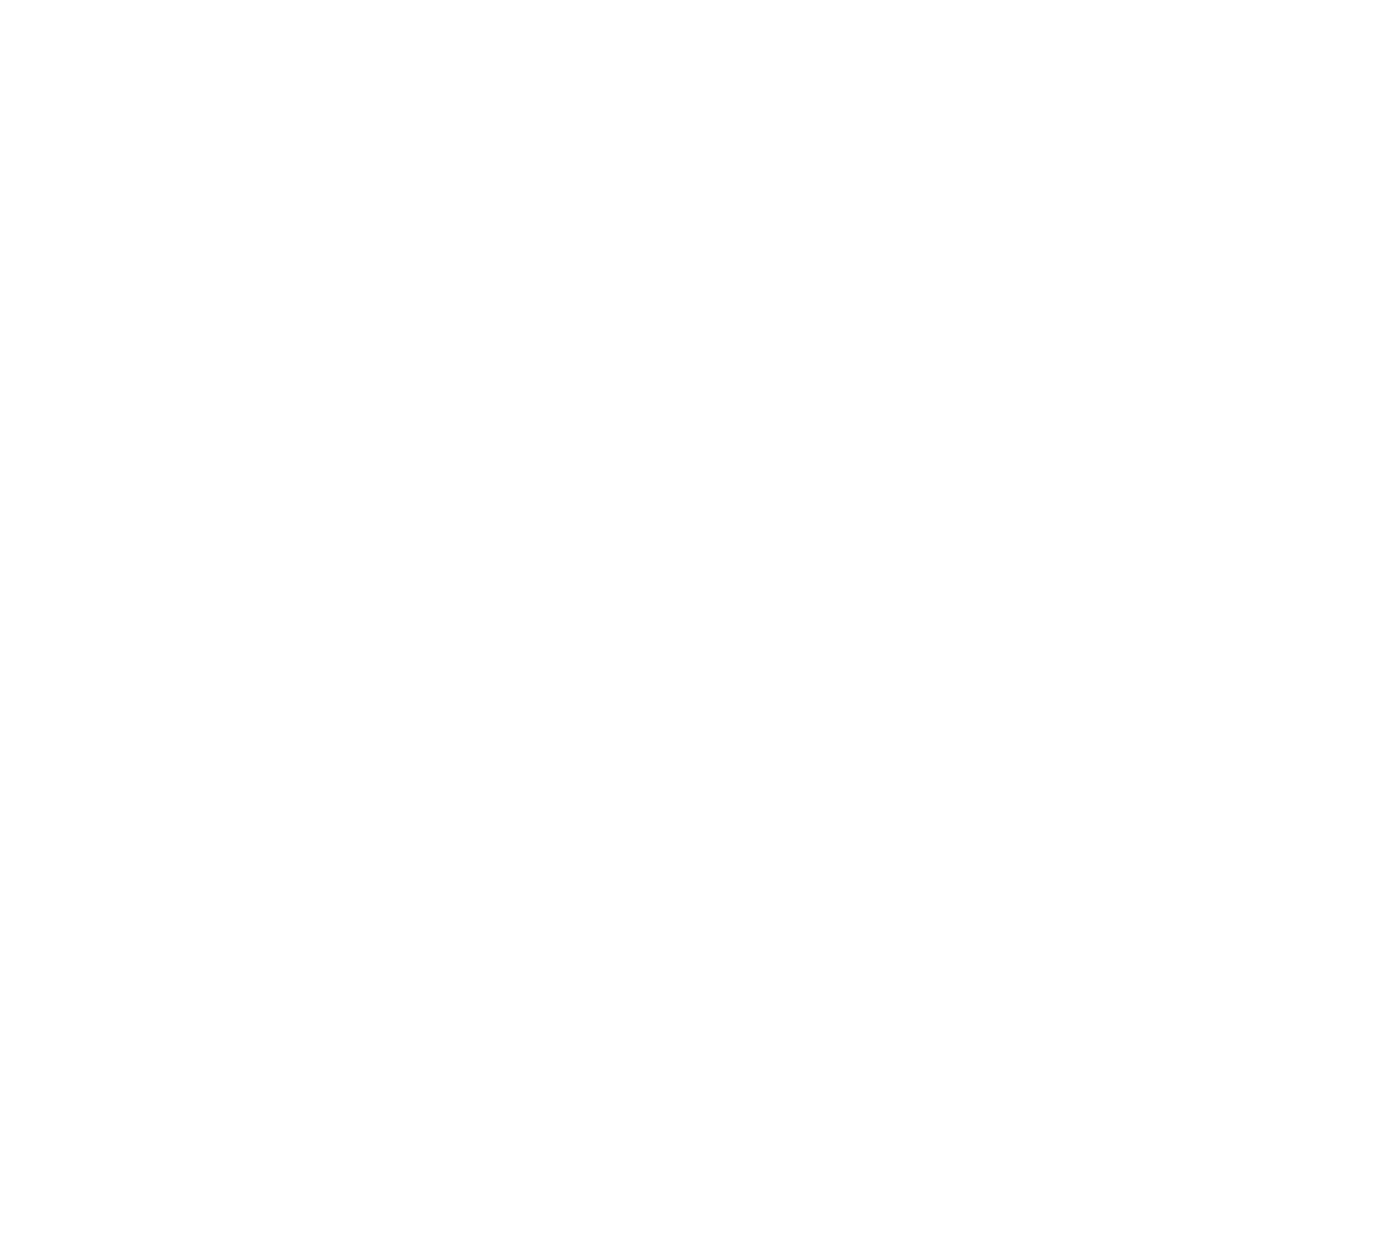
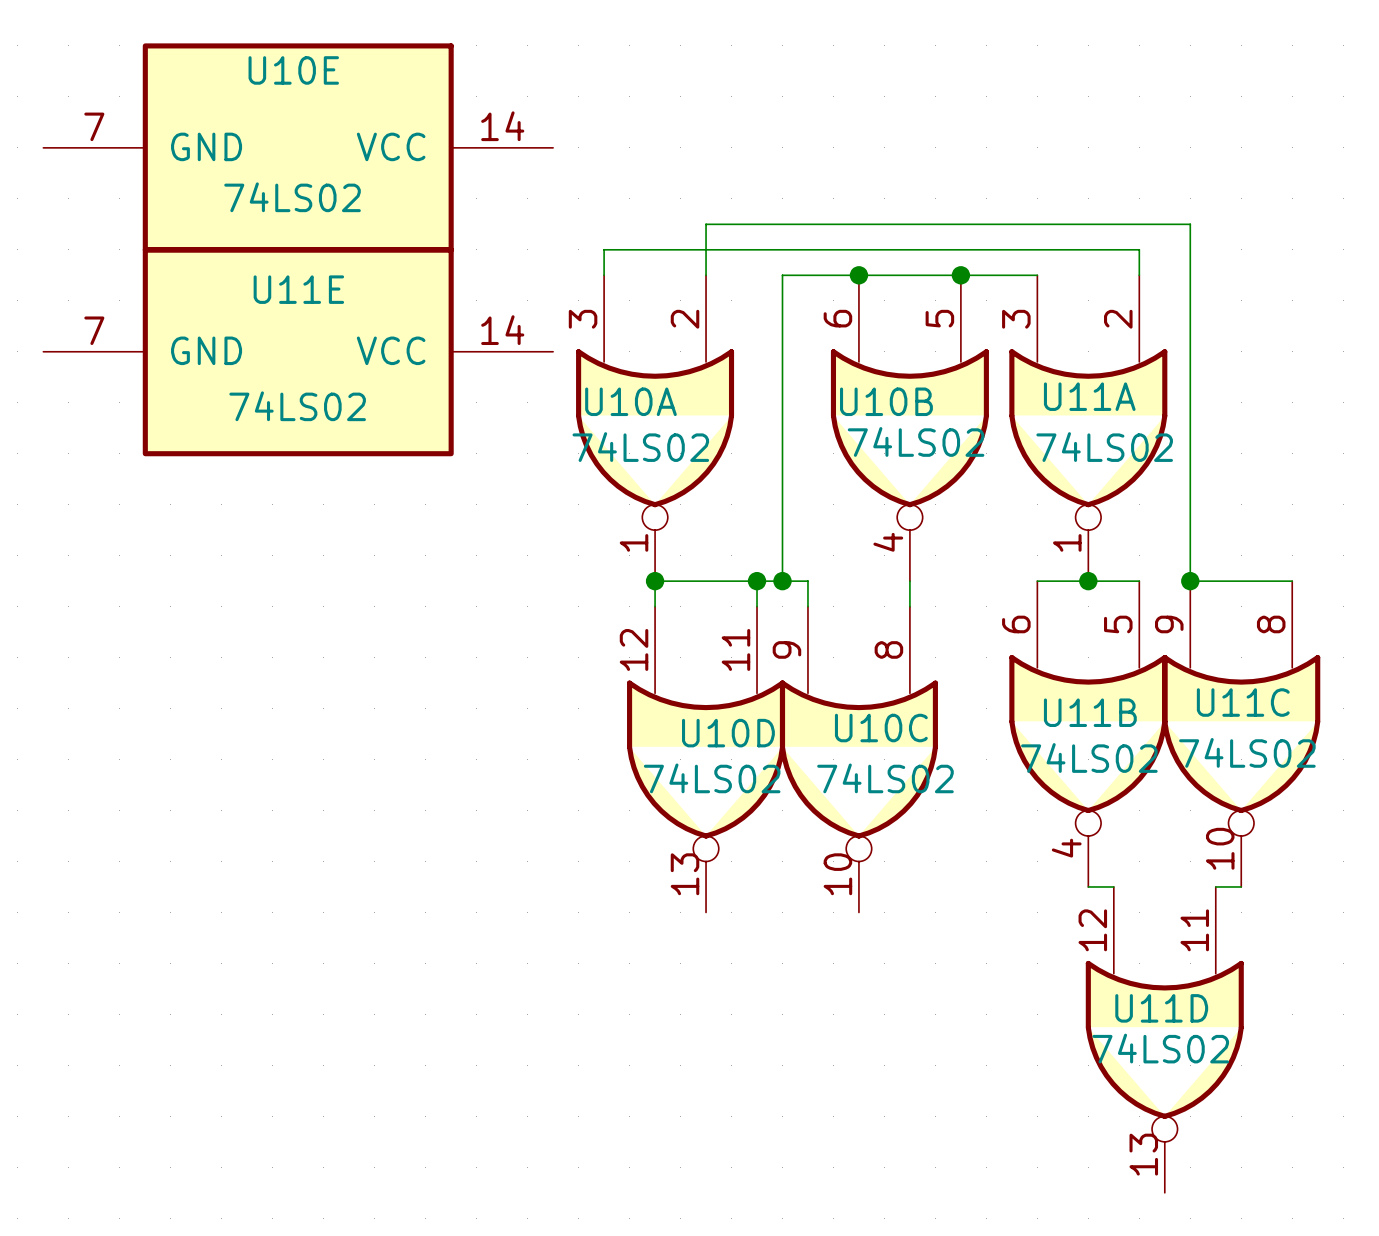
U10E: none -> 74LS02 (298, 147)
wire: none -> (604, 275) (604, 249) (1139, 249) (1139, 275)
wire: none -> (706, 275) (706, 224) (1190, 224) (1190, 581) (1292, 581)
junction: none -> (858, 275)
junction: none -> (960, 275)
wire: none -> (1037, 275) (782, 275) (782, 581)
U11E: none -> 74LS02 (298, 351)
U10A: none -> 74LS02 (655, 428)
U10B: none -> 74LS02 (909, 428)
U11A: none -> 74LS02 (1088, 428)
junction: none -> (655, 581)
wire: none -> (757, 581) (757, 606)
junction: none -> (757, 581)
junction: none -> (782, 581)
wire: none -> (909, 581) (909, 606)
wire: none -> (1037, 581) (1139, 581)
junction: none -> (1088, 581)
junction: none -> (1190, 581)
wire: none -> (655, 606) (655, 581) (807, 581) (807, 606)
U11B: none -> 74LS02 (1088, 734)
U11C: none -> 74LS02 (1241, 734)
U10D: none -> 74LS02 (706, 759)
U10C: none -> 74LS02 (858, 759)
wire: none -> (1088, 886) (1113, 886)
wire: none -> (1215, 886) (1241, 886)
U11D: none -> 74LS02 (1164, 1039)

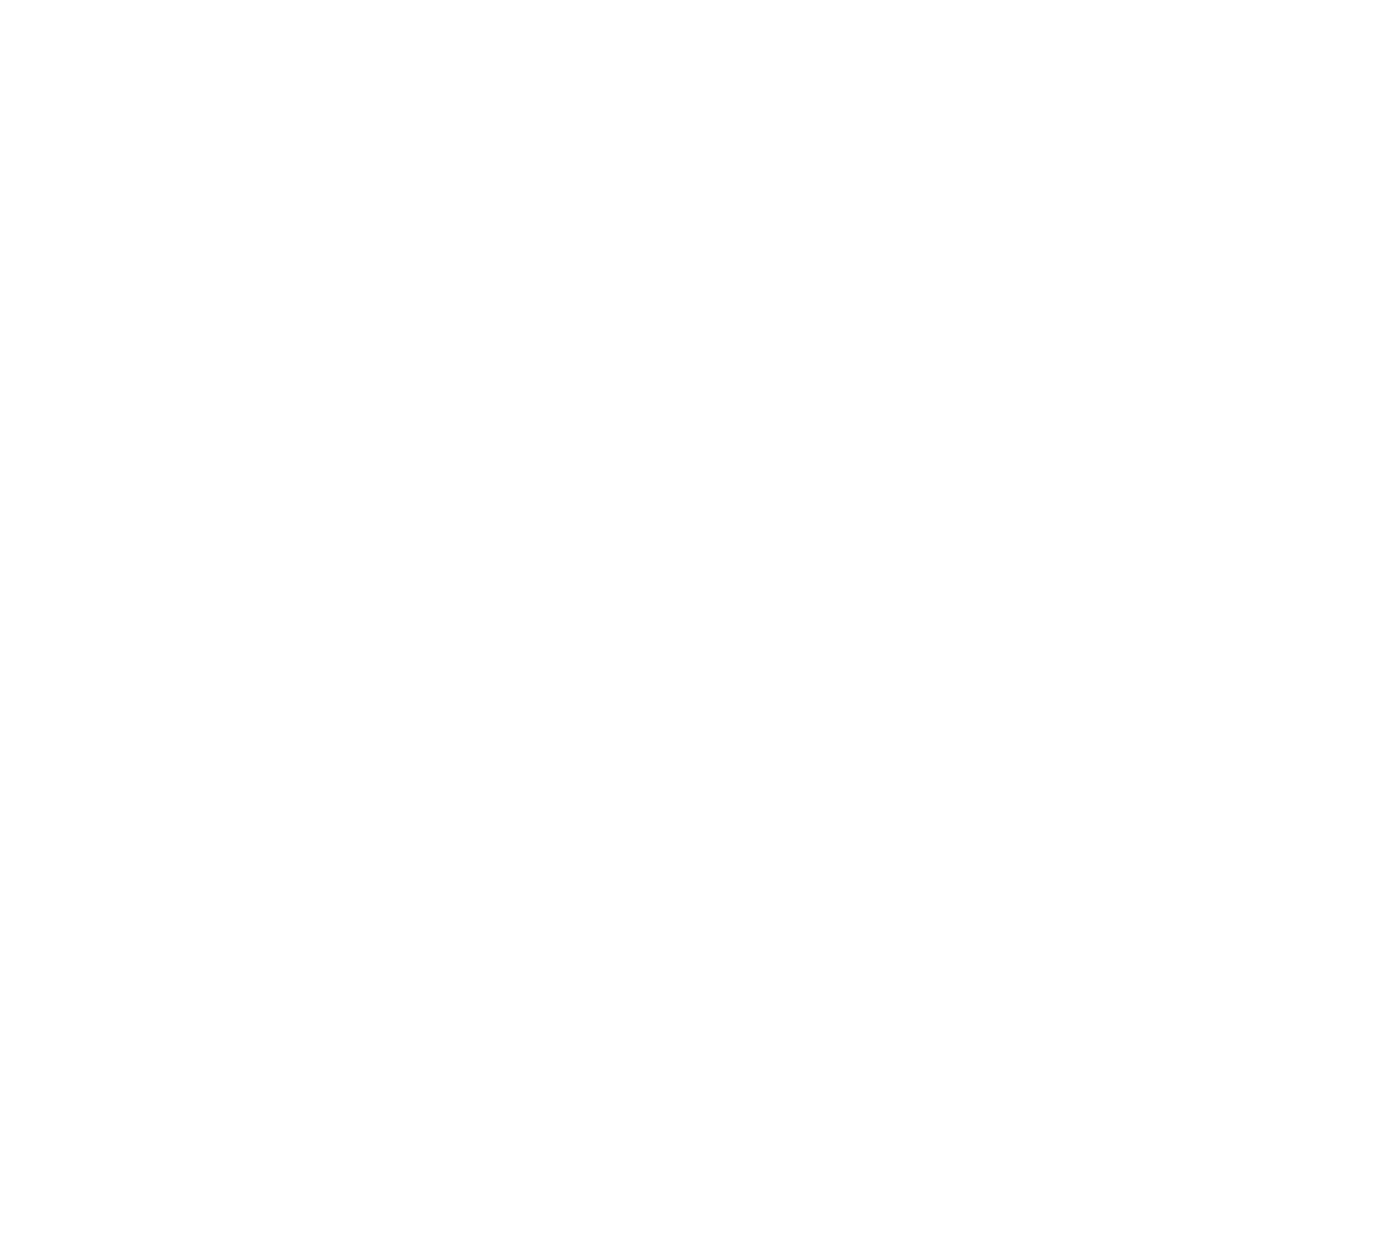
U10E: 74LS02 (298, 147) -> none
wire: (604, 275) (604, 249) (1139, 249) (1139, 275) -> none
wire: (706, 275) (706, 224) (1190, 224) (1190, 581) (1292, 581) -> none
junction: (858, 275) -> none
junction: (960, 275) -> none
wire: (1037, 275) (782, 275) (782, 581) -> none
U11E: 74LS02 (298, 351) -> none
U10A: 74LS02 (655, 428) -> none
U10B: 74LS02 (909, 428) -> none
U11A: 74LS02 (1088, 428) -> none
junction: (655, 581) -> none
wire: (757, 581) (757, 606) -> none
junction: (757, 581) -> none
junction: (782, 581) -> none
wire: (909, 581) (909, 606) -> none
wire: (1037, 581) (1139, 581) -> none
junction: (1088, 581) -> none
junction: (1190, 581) -> none
wire: (655, 606) (655, 581) (807, 581) (807, 606) -> none
U11B: 74LS02 (1088, 734) -> none
U11C: 74LS02 (1241, 734) -> none
U10D: 74LS02 (706, 759) -> none
U10C: 74LS02 (858, 759) -> none
wire: (1088, 886) (1113, 886) -> none
wire: (1215, 886) (1241, 886) -> none
U11D: 74LS02 (1164, 1039) -> none

